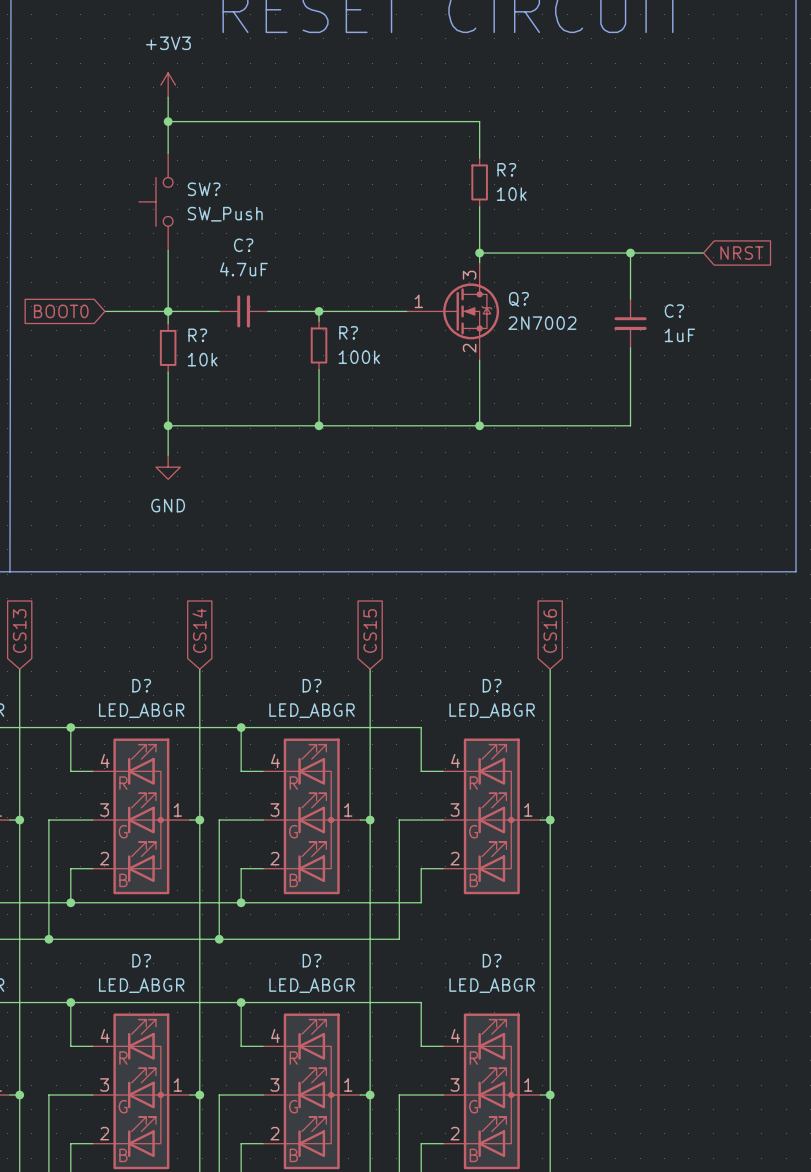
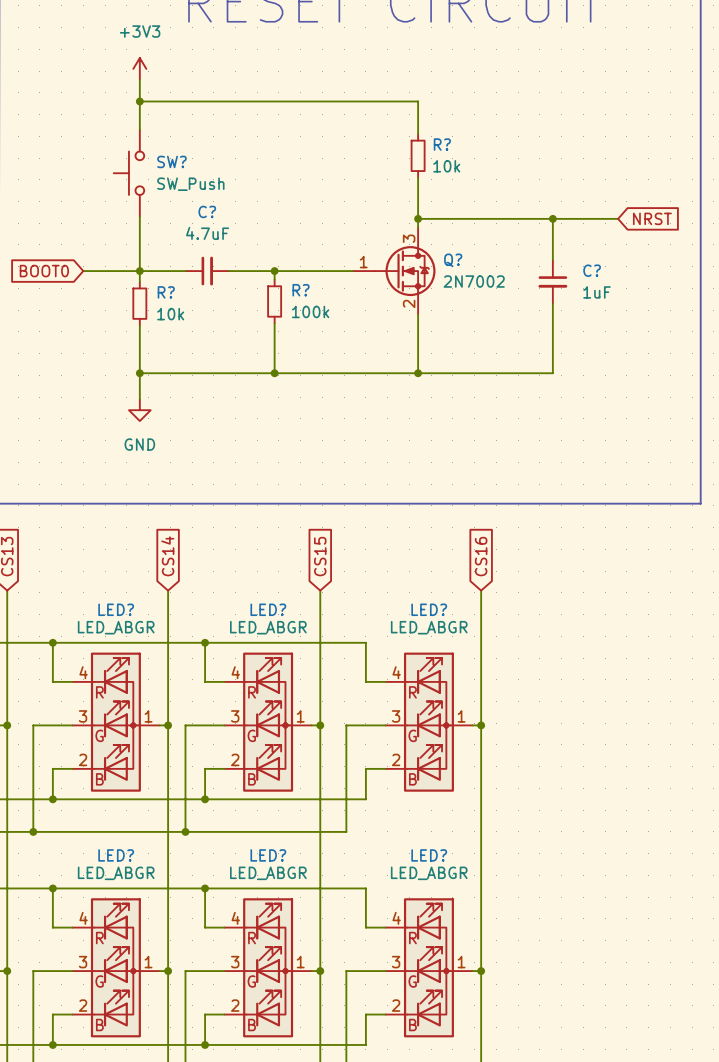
D? name: D? (141, 685) -> LED? (116, 609)
D? name: D? (312, 685) -> LED? (268, 609)
D? name: D? (492, 685) -> LED? (429, 609)
D? name: D? (141, 960) -> LED? (116, 855)
D? name: D? (312, 960) -> LED? (268, 855)
D? name: D? (492, 960) -> LED? (429, 855)

